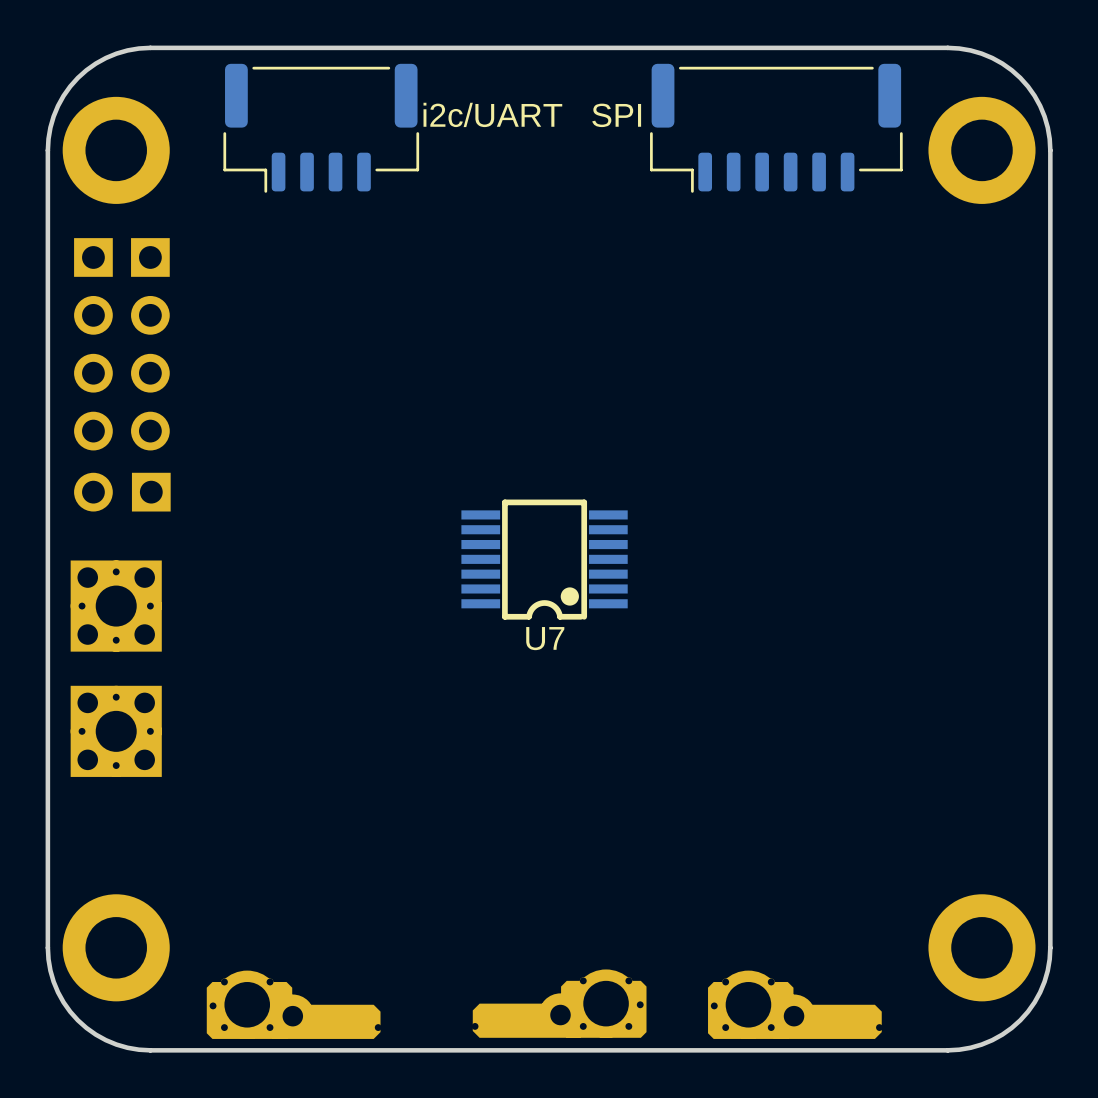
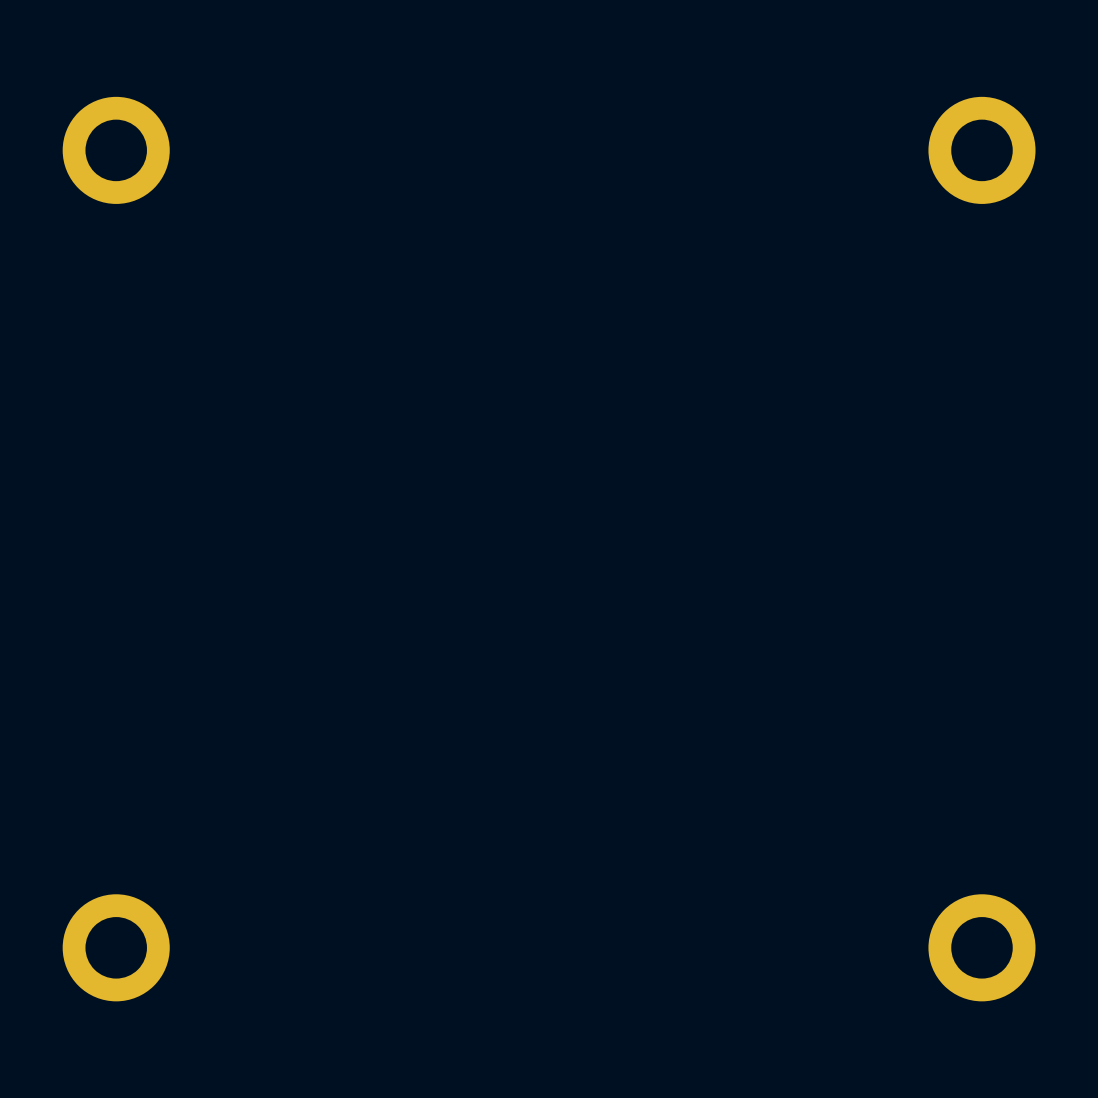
board edge: (947, 47) (150, 47) (127, 50) (105, 58) (86, 70) (70, 86) (53, 116) (47, 150) (47, 947) (50, 970) (58, 992) (70, 1011) (86, 1027) (116, 1044) (150, 1050) (947, 1050) (970, 1047) (992, 1040) (1011, 1027) (1027, 1011) (1044, 981) (1050, 947) (1049, 138) (1040, 105) (1027, 86) (1011, 70) (981, 53) (947, 47) -> none
part: i2c/UART (321, 128) -> none
part: SPI (776, 128) -> none
part: (93, 344) -> none
part: (150, 344) -> none
part: (122, 492) -> none
U7: (544, 559) -> none
part: (116, 606) -> none
part: (116, 731) -> none
part: (559, 1003) -> none
part: (294, 1004) -> none
part: (795, 1004) -> none

